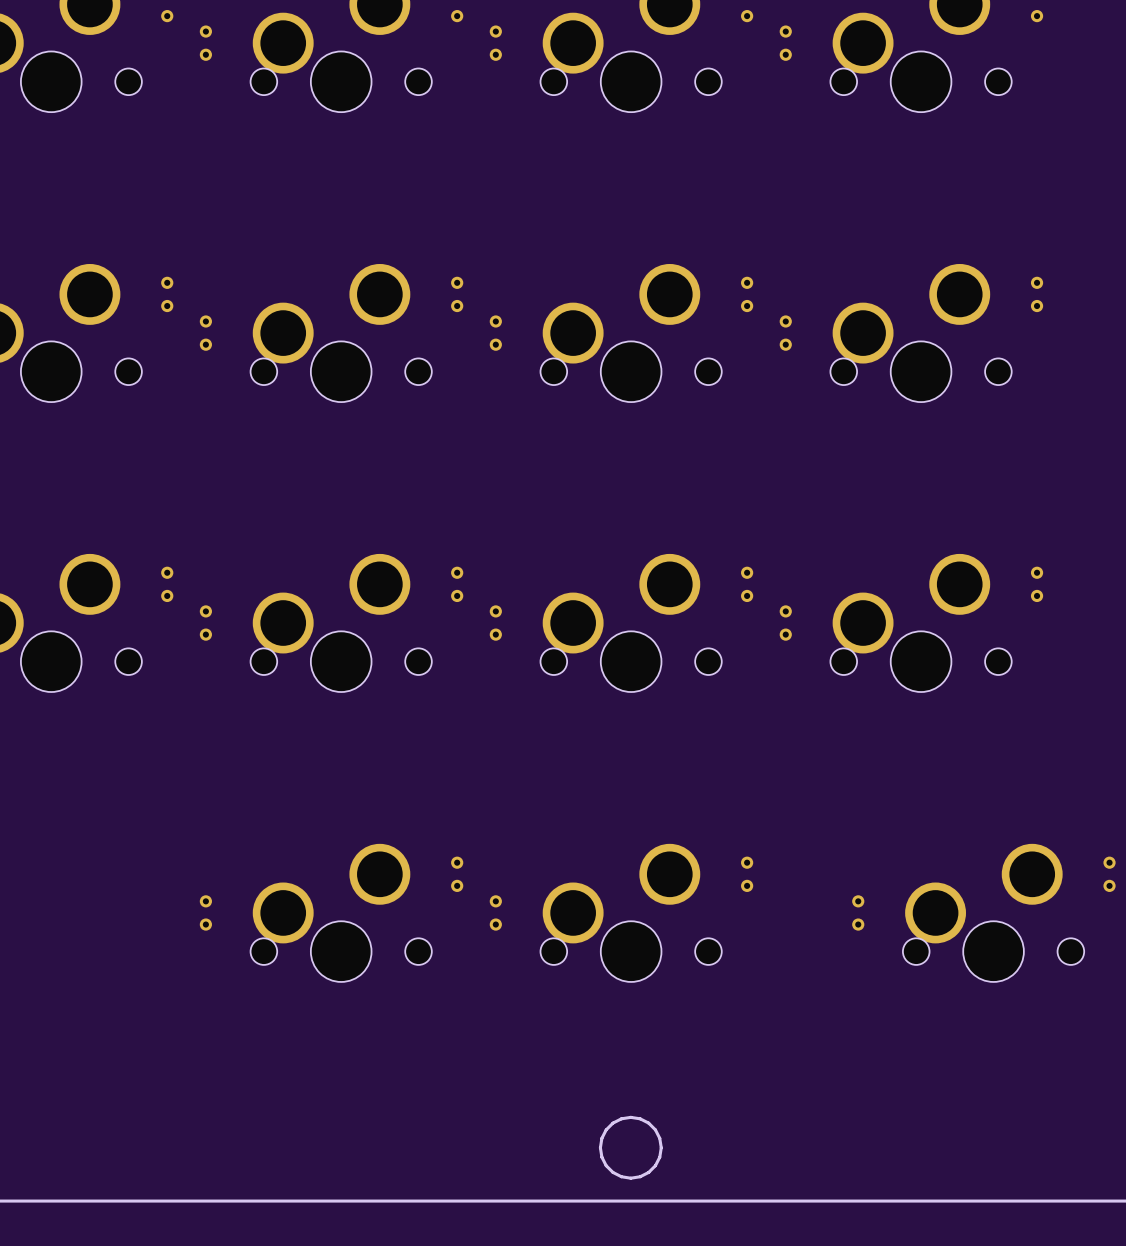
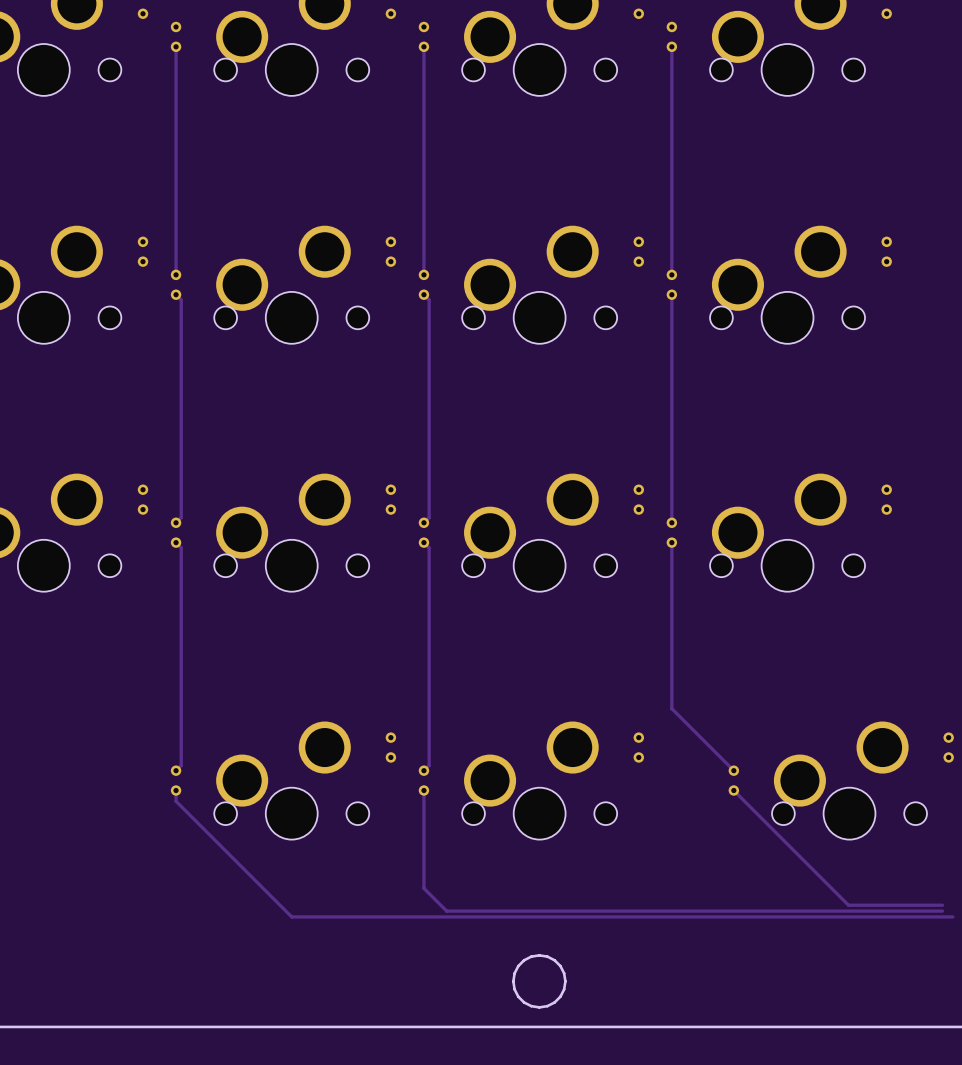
track: none -> (176, 46) (176, 274)
track: none -> (423, 46) (423, 274)
track: none -> (671, 46) (671, 274)
track: none -> (176, 294) (181, 299) (181, 517) (176, 522)
track: none -> (423, 294) (429, 299) (429, 517) (423, 522)
track: none -> (671, 294) (671, 522)
track: none -> (176, 542) (181, 547) (181, 765) (176, 770)
track: none -> (423, 542) (429, 547) (429, 765) (423, 770)
track: none -> (671, 542) (671, 708) (733, 770)
track: none -> (176, 790) (176, 801) (291, 916) (952, 916)
track: none -> (423, 790) (423, 888) (446, 911) (942, 911)
track: none -> (733, 790) (848, 905) (942, 905)

